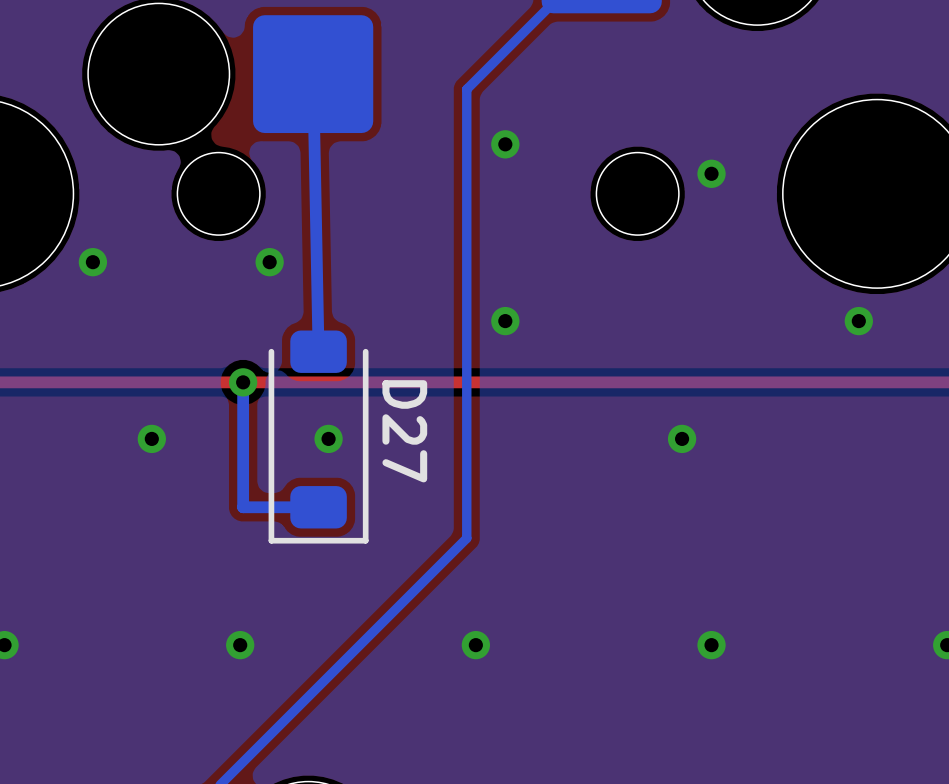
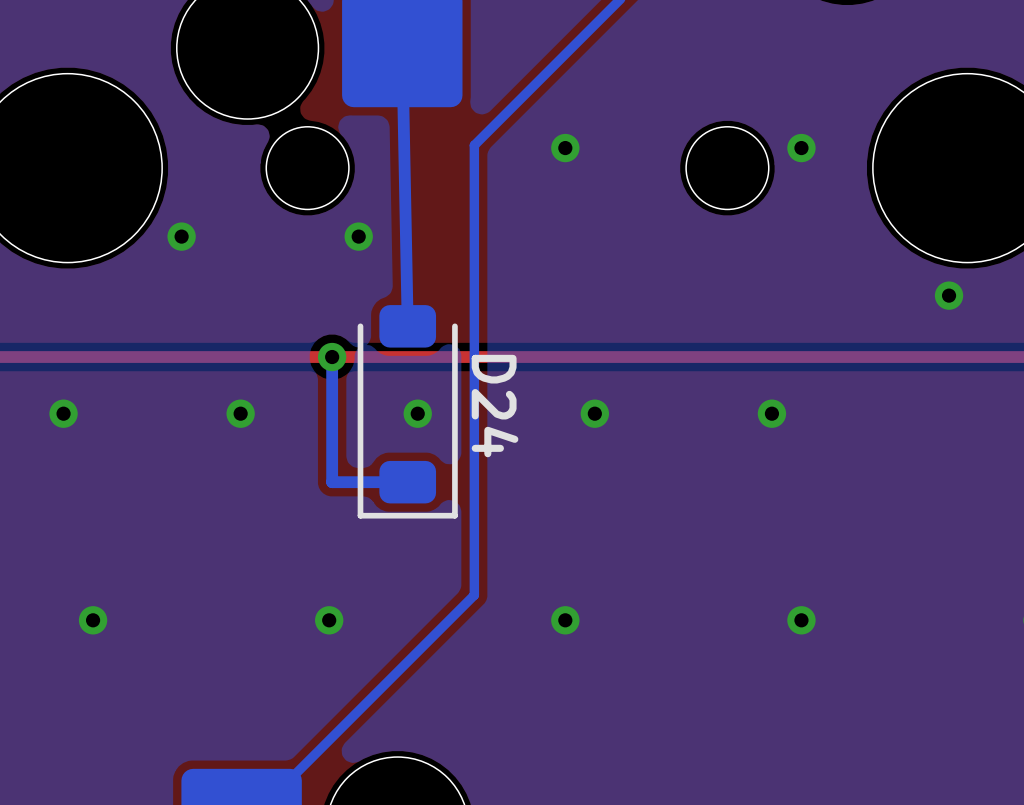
bottom track: (466, 89) (466, 538) (385, 620) -> (556, 63) (474, 145) (474, 595)
via position: (505, 144) -> (565, 148)
via: (505, 321) -> none
D27 name: D27 (404, 431) -> D24 (495, 406)
via: none -> (594, 413)

